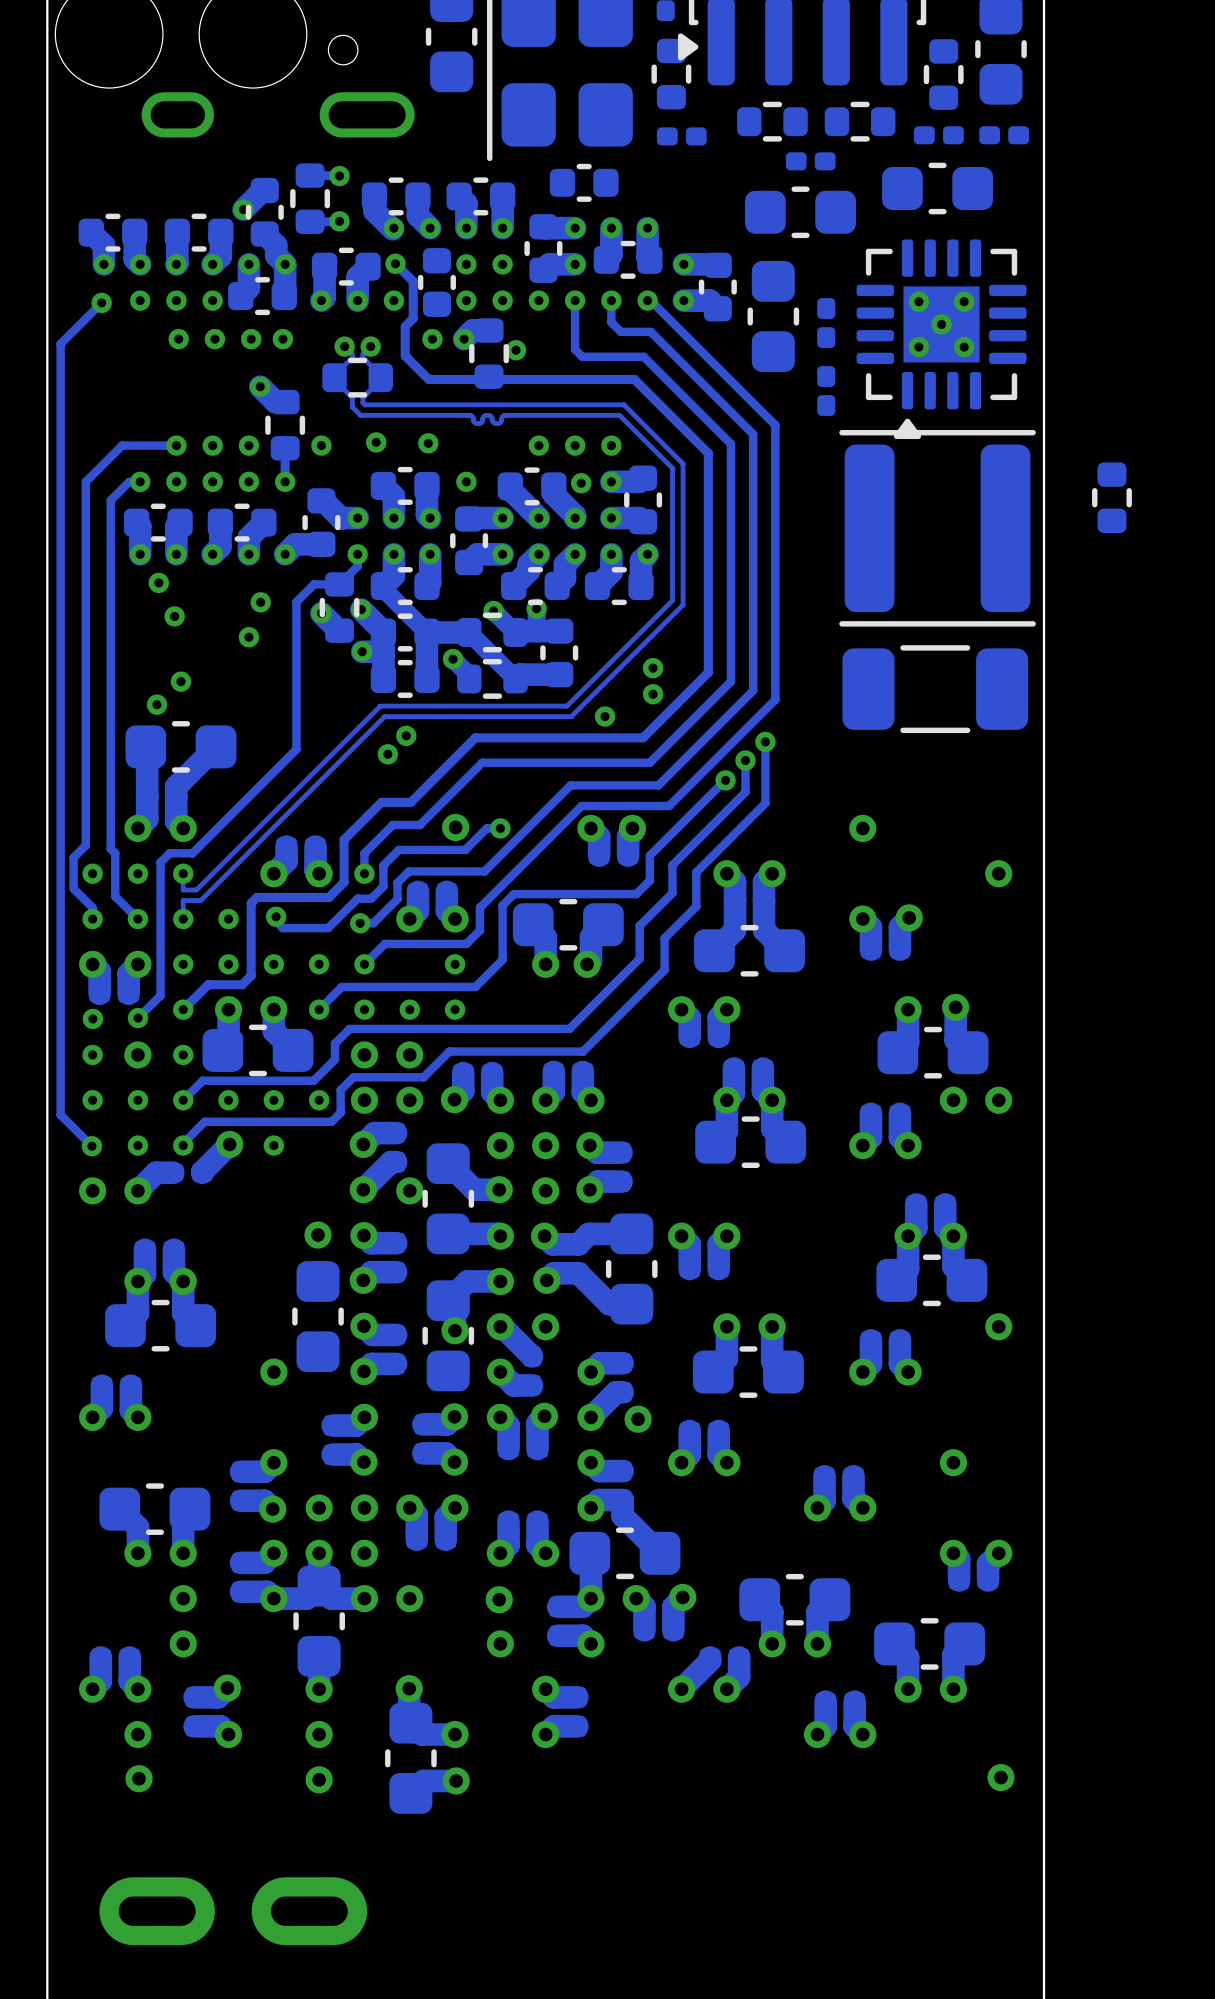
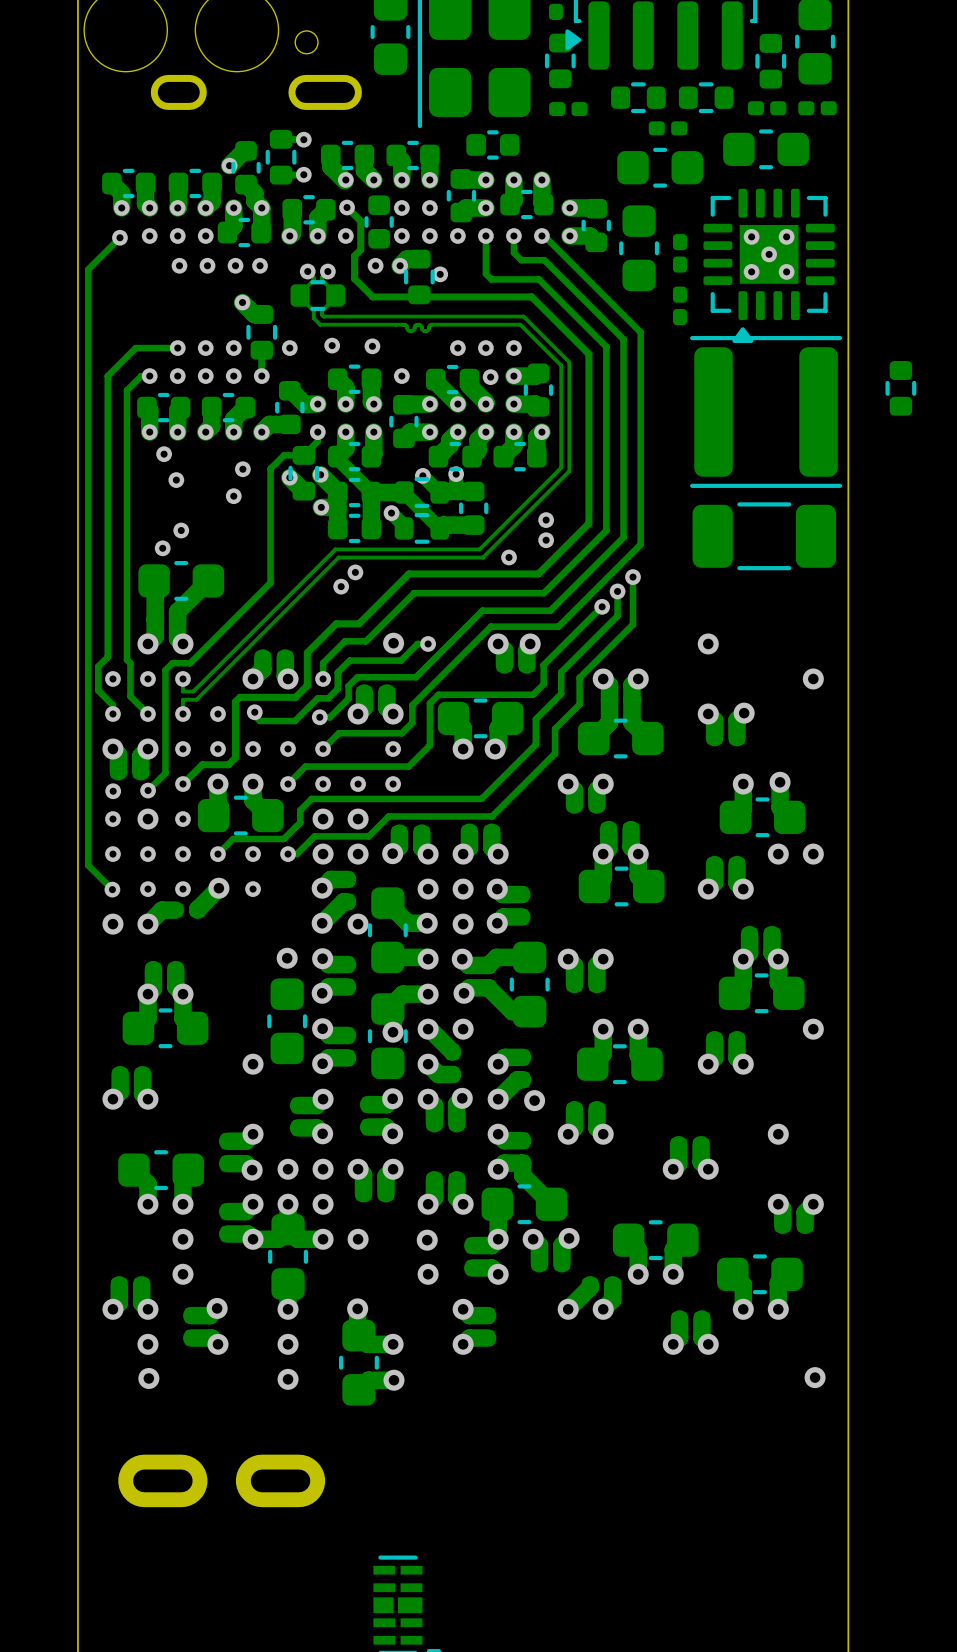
track: (248, 1080) (202, 1080) (183, 1100) -> (233, 838) (217, 854)
track: (340, 1090) (340, 1112) (331, 1121) (204, 1121) (183, 1143) (183, 1145) -> (304, 846) (296, 854) (288, 854)

